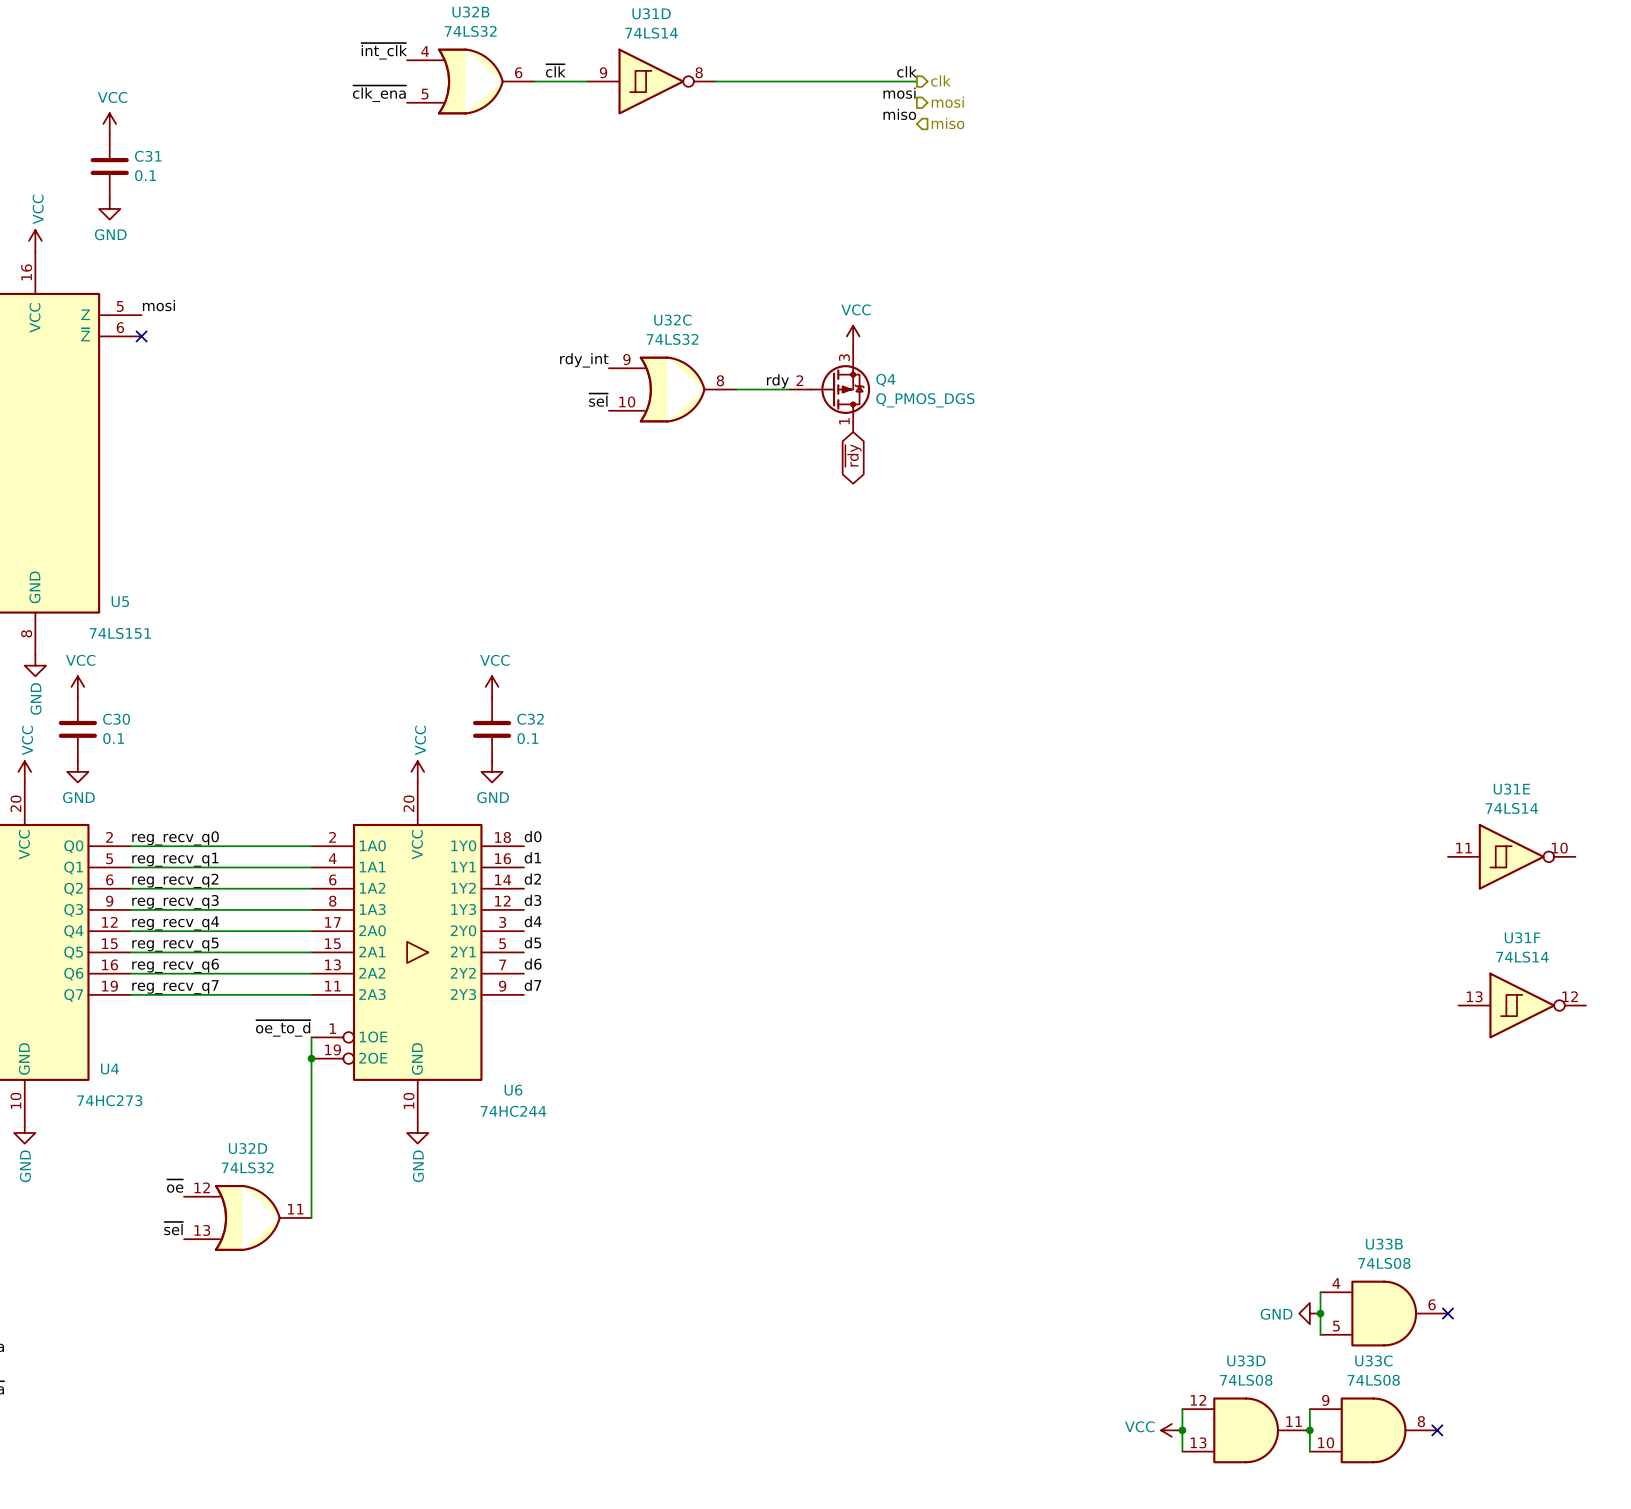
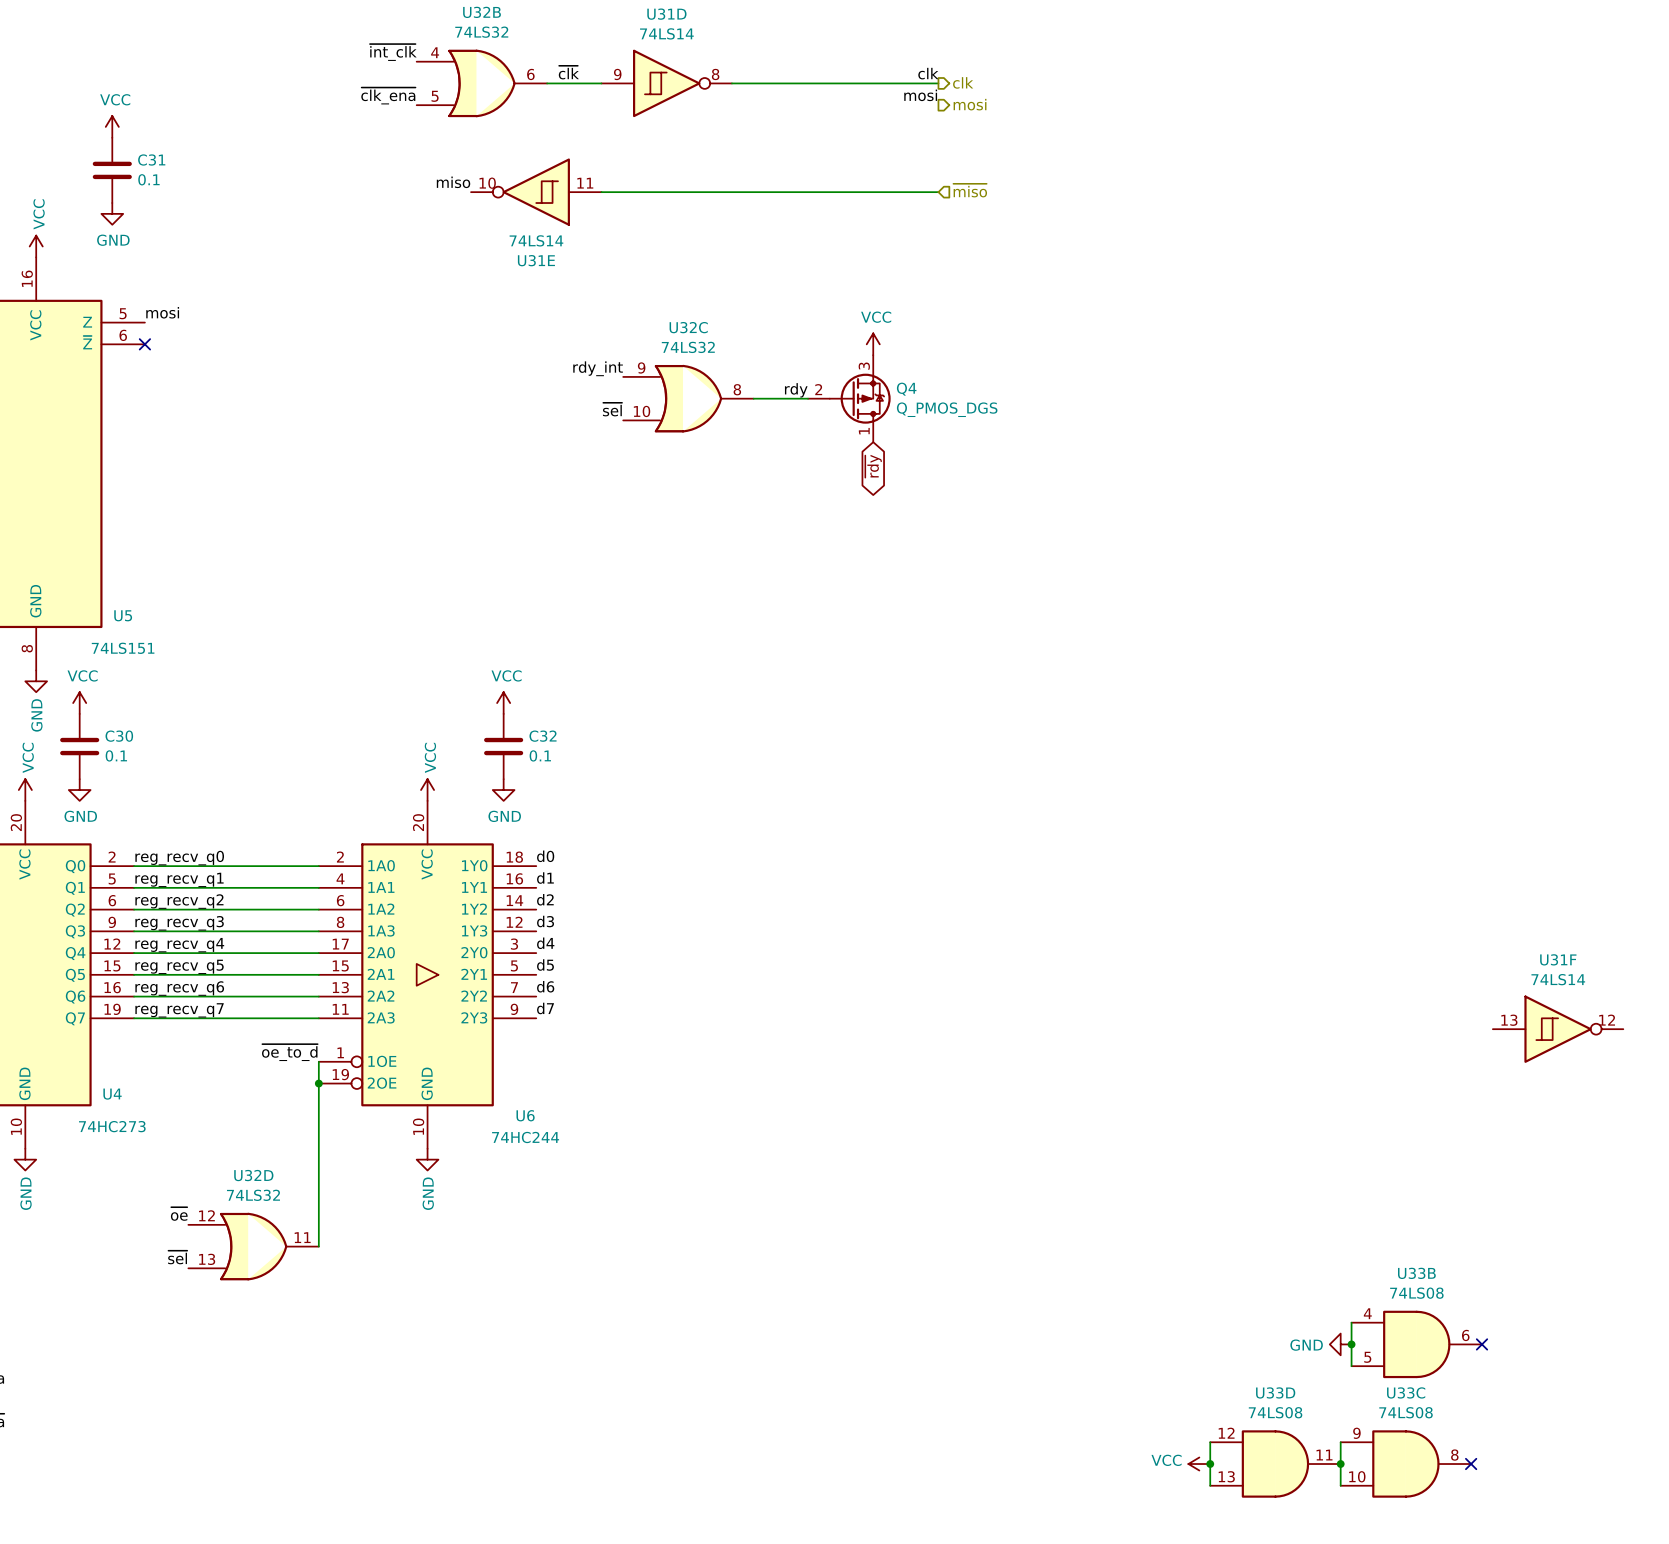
label: miso (899, 114) -> none
hierarchical label: miso (948, 123) -> none
label: none -> miso (453, 182)
hierarchical label: none -> ~{miso} (970, 190)
wire: none -> (601, 192) (938, 192)
U31E rotation: 0° (1511, 856) -> 180° (536, 192)
U31E position: (1511, 856) -> (536, 192)

